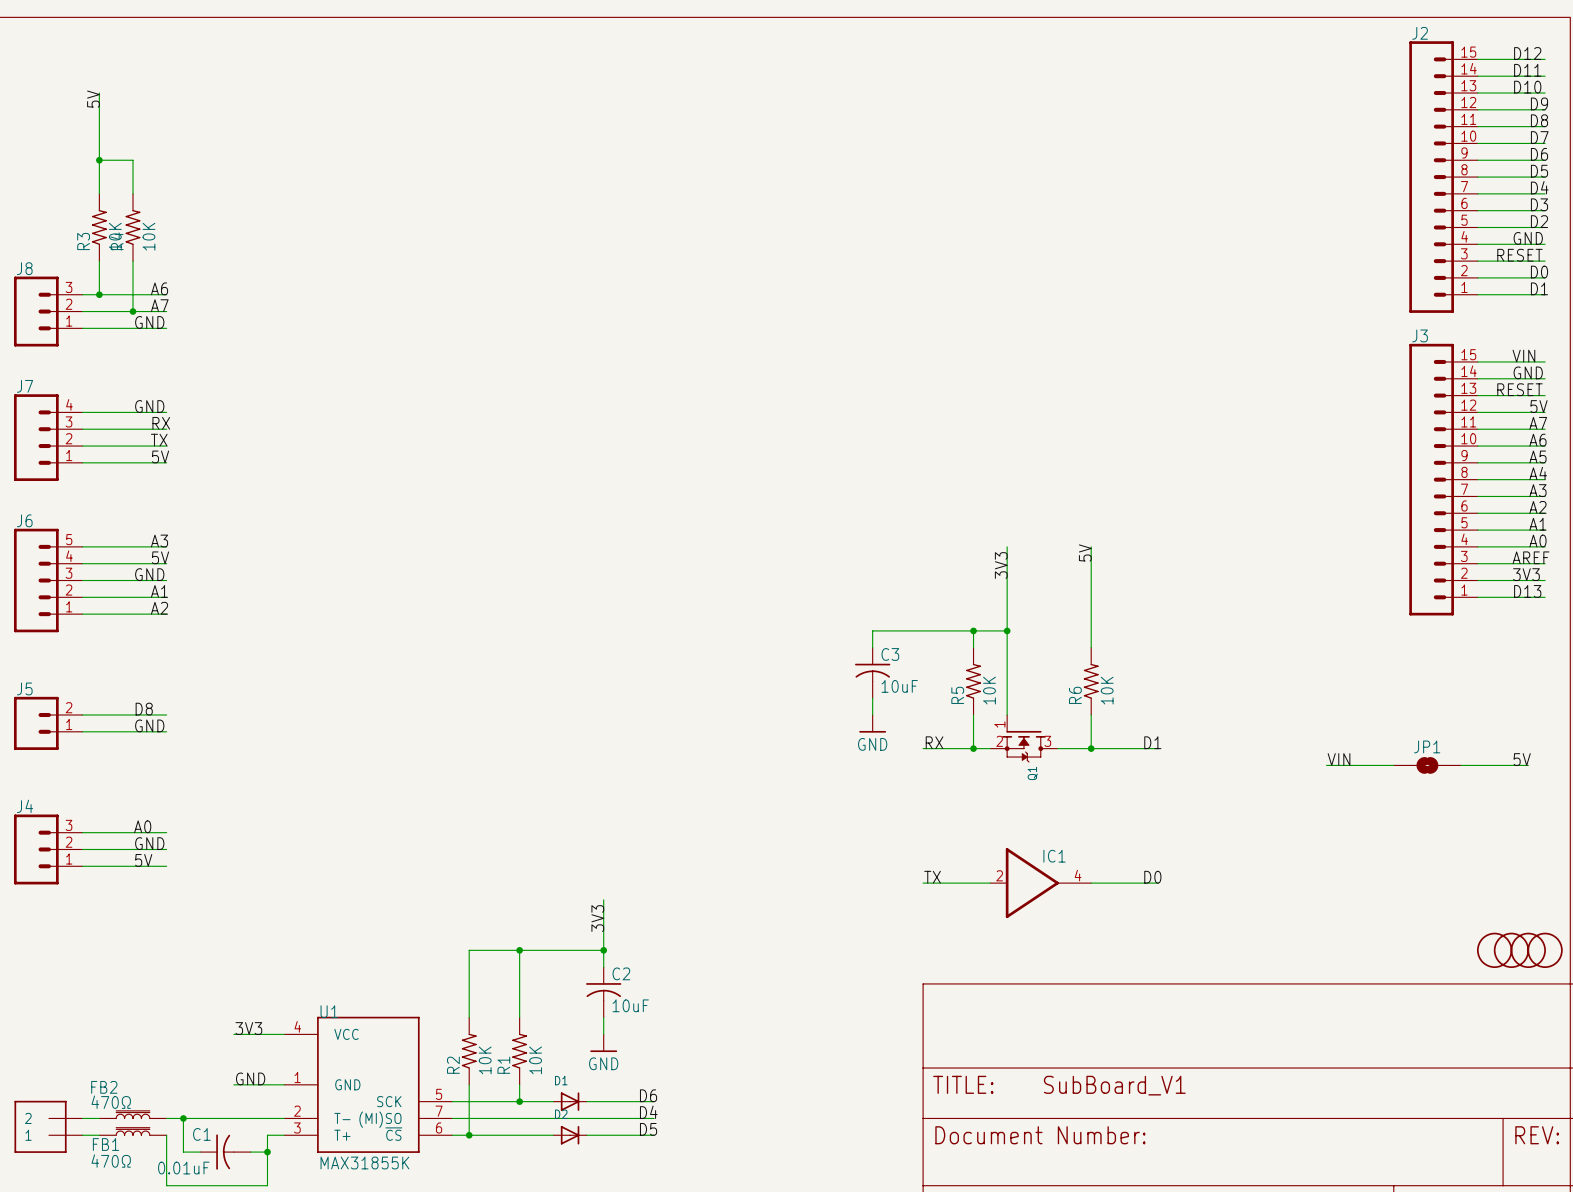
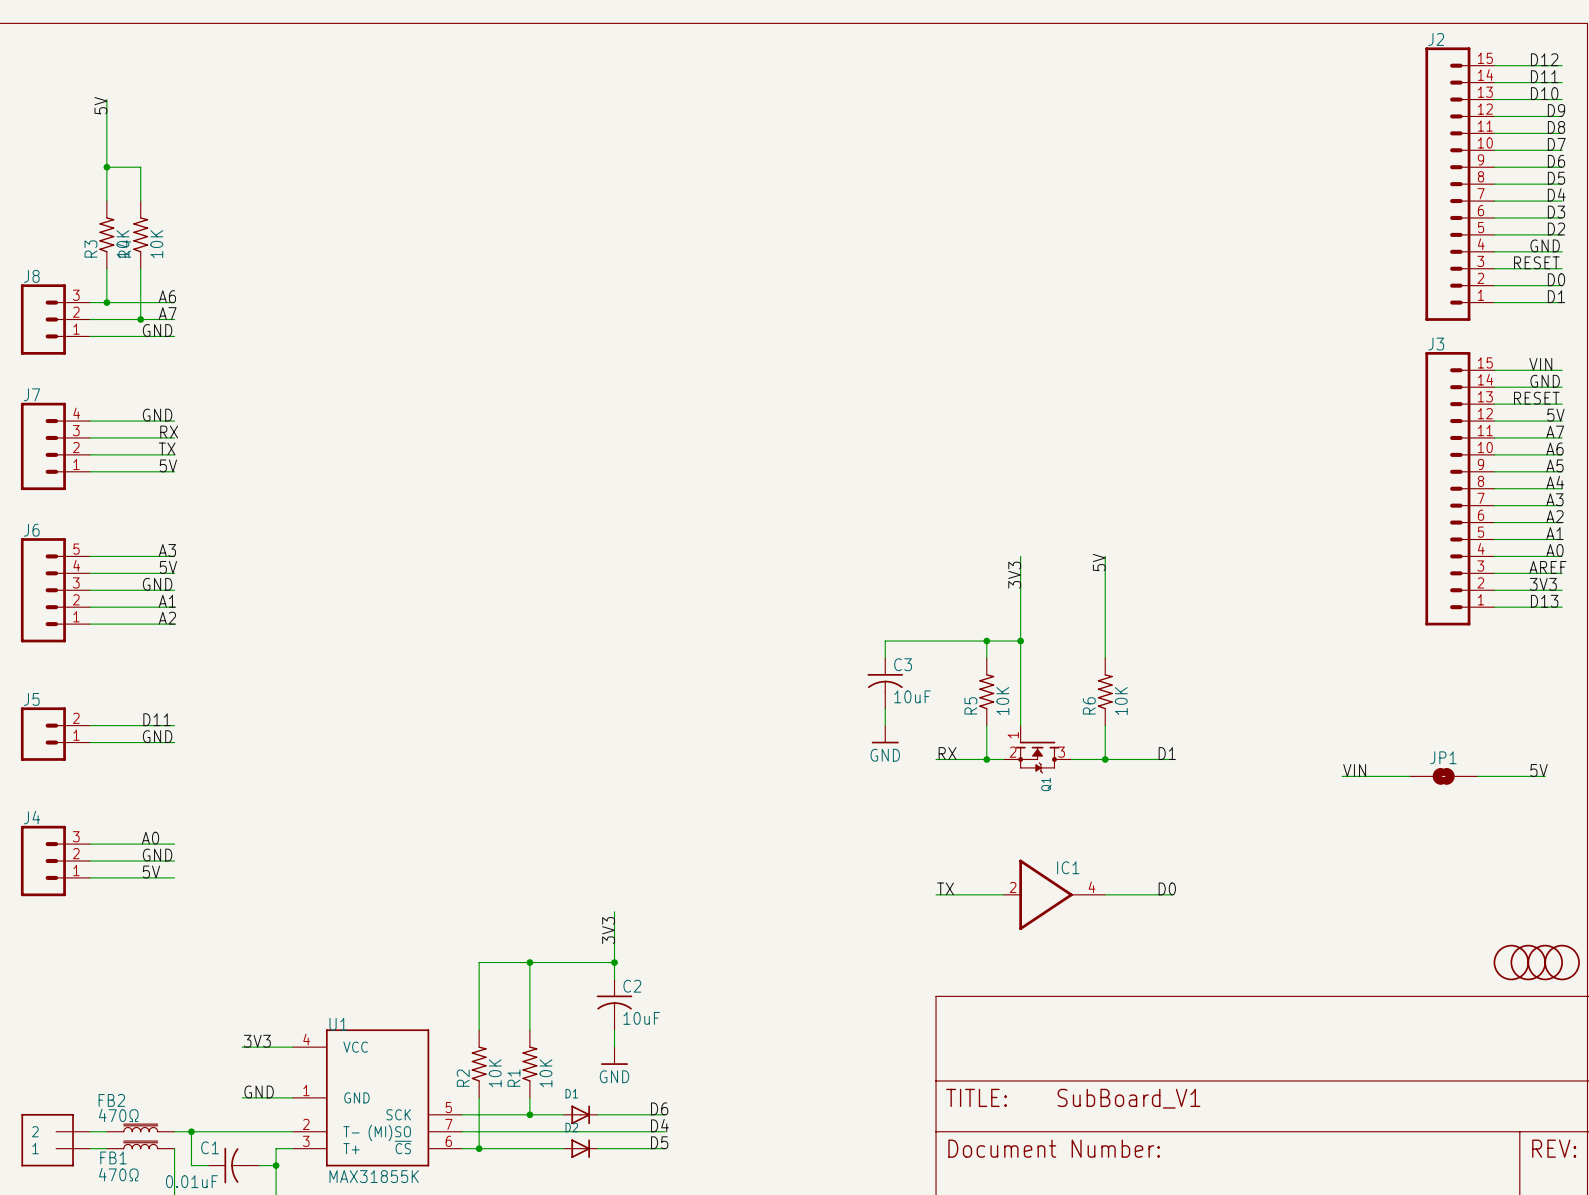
label: D8 (144, 709) -> D11 (157, 719)

